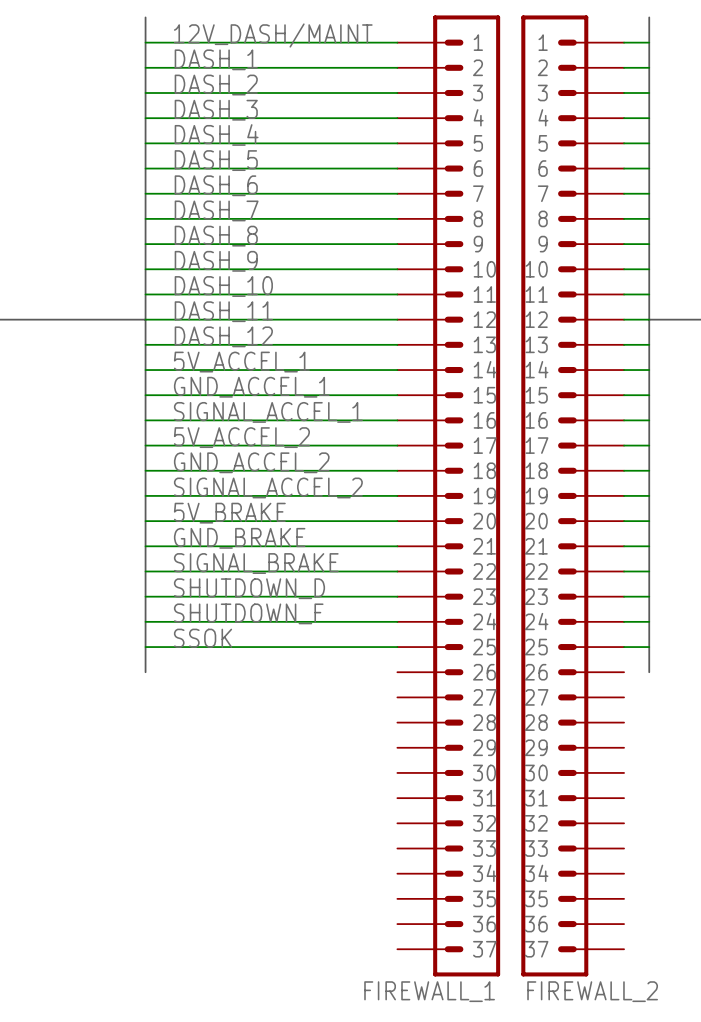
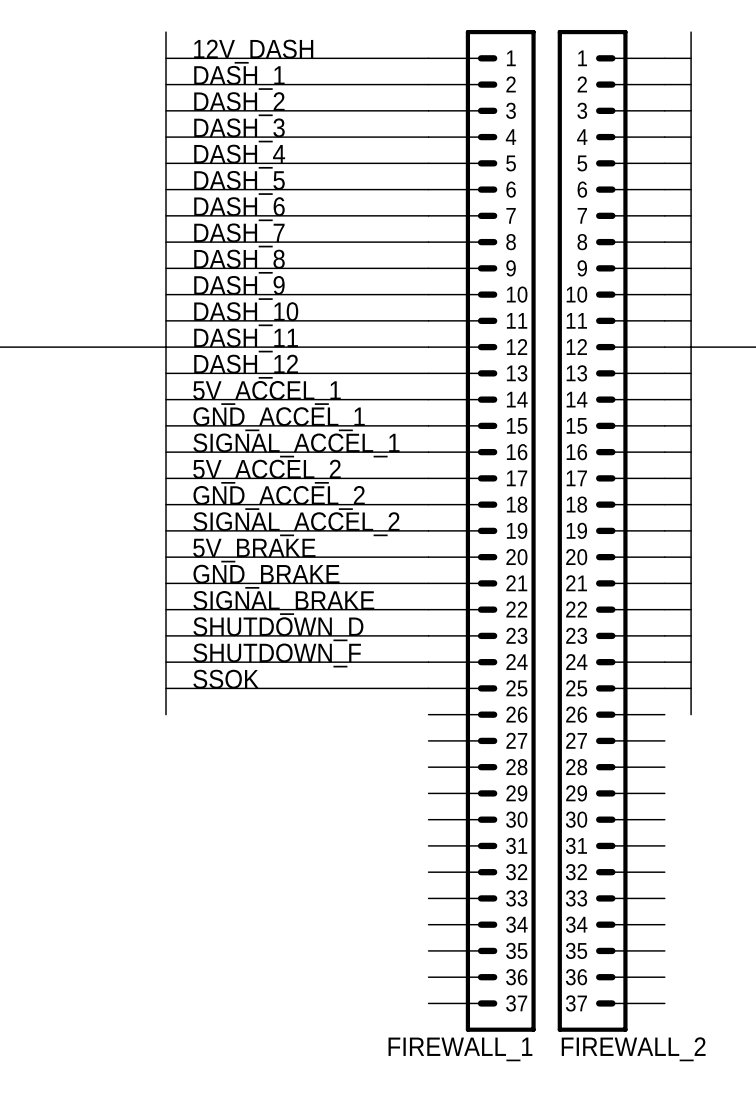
label: 12V_DASH/MAINT (273, 35) -> 12V_DASH (253, 51)

